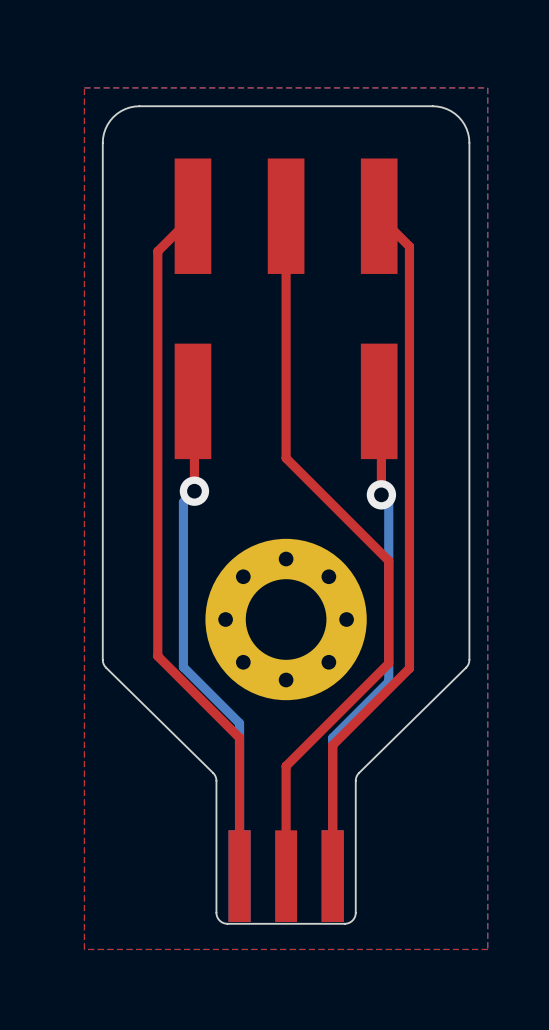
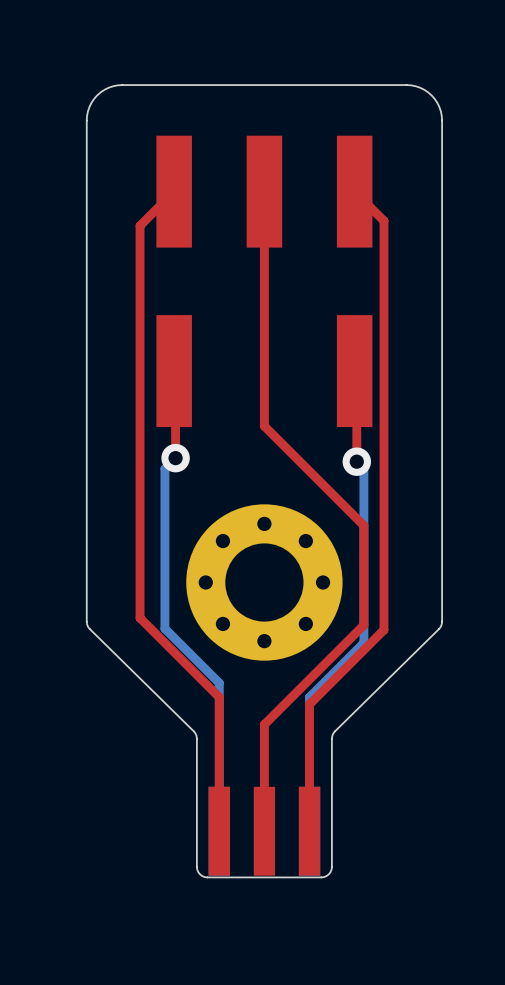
top zone outline: (84, 87) (84, 949) (487, 949) (487, 87) (84, 87) -> none

